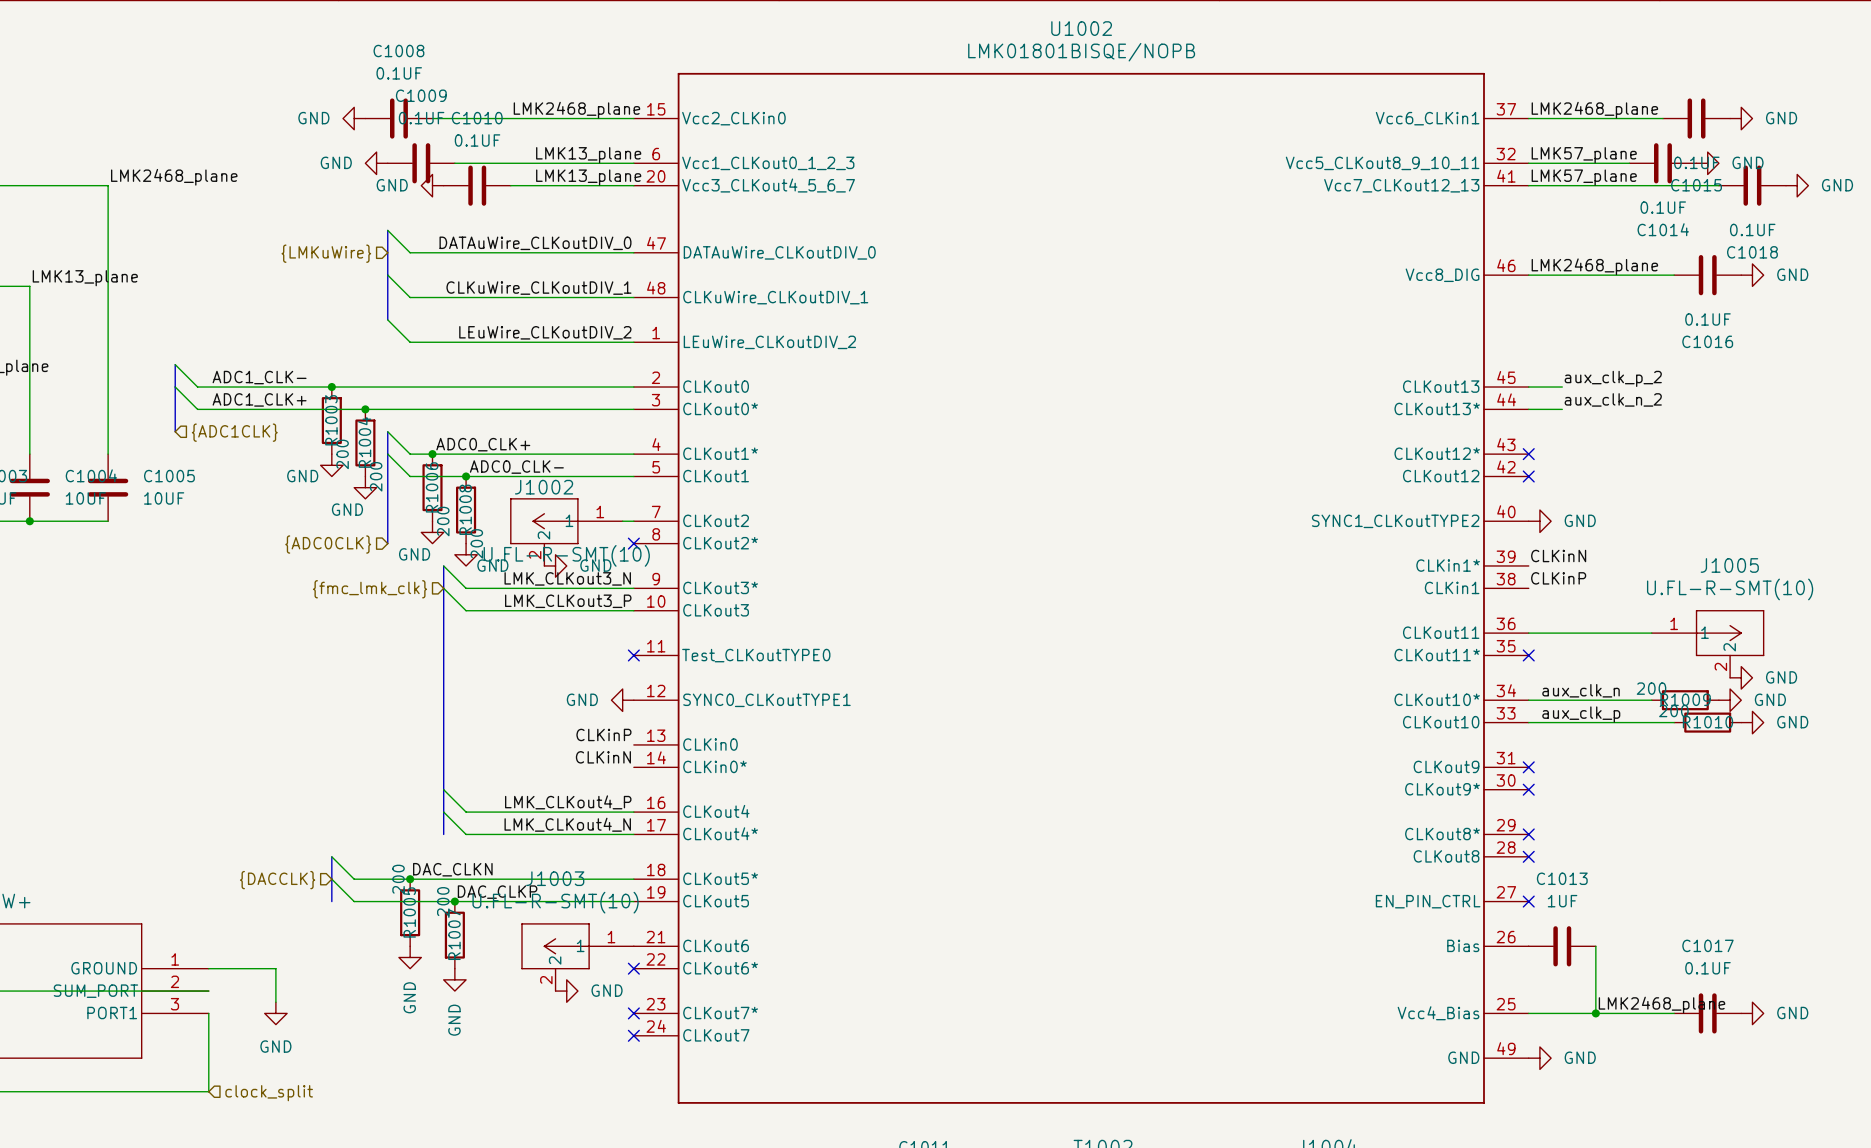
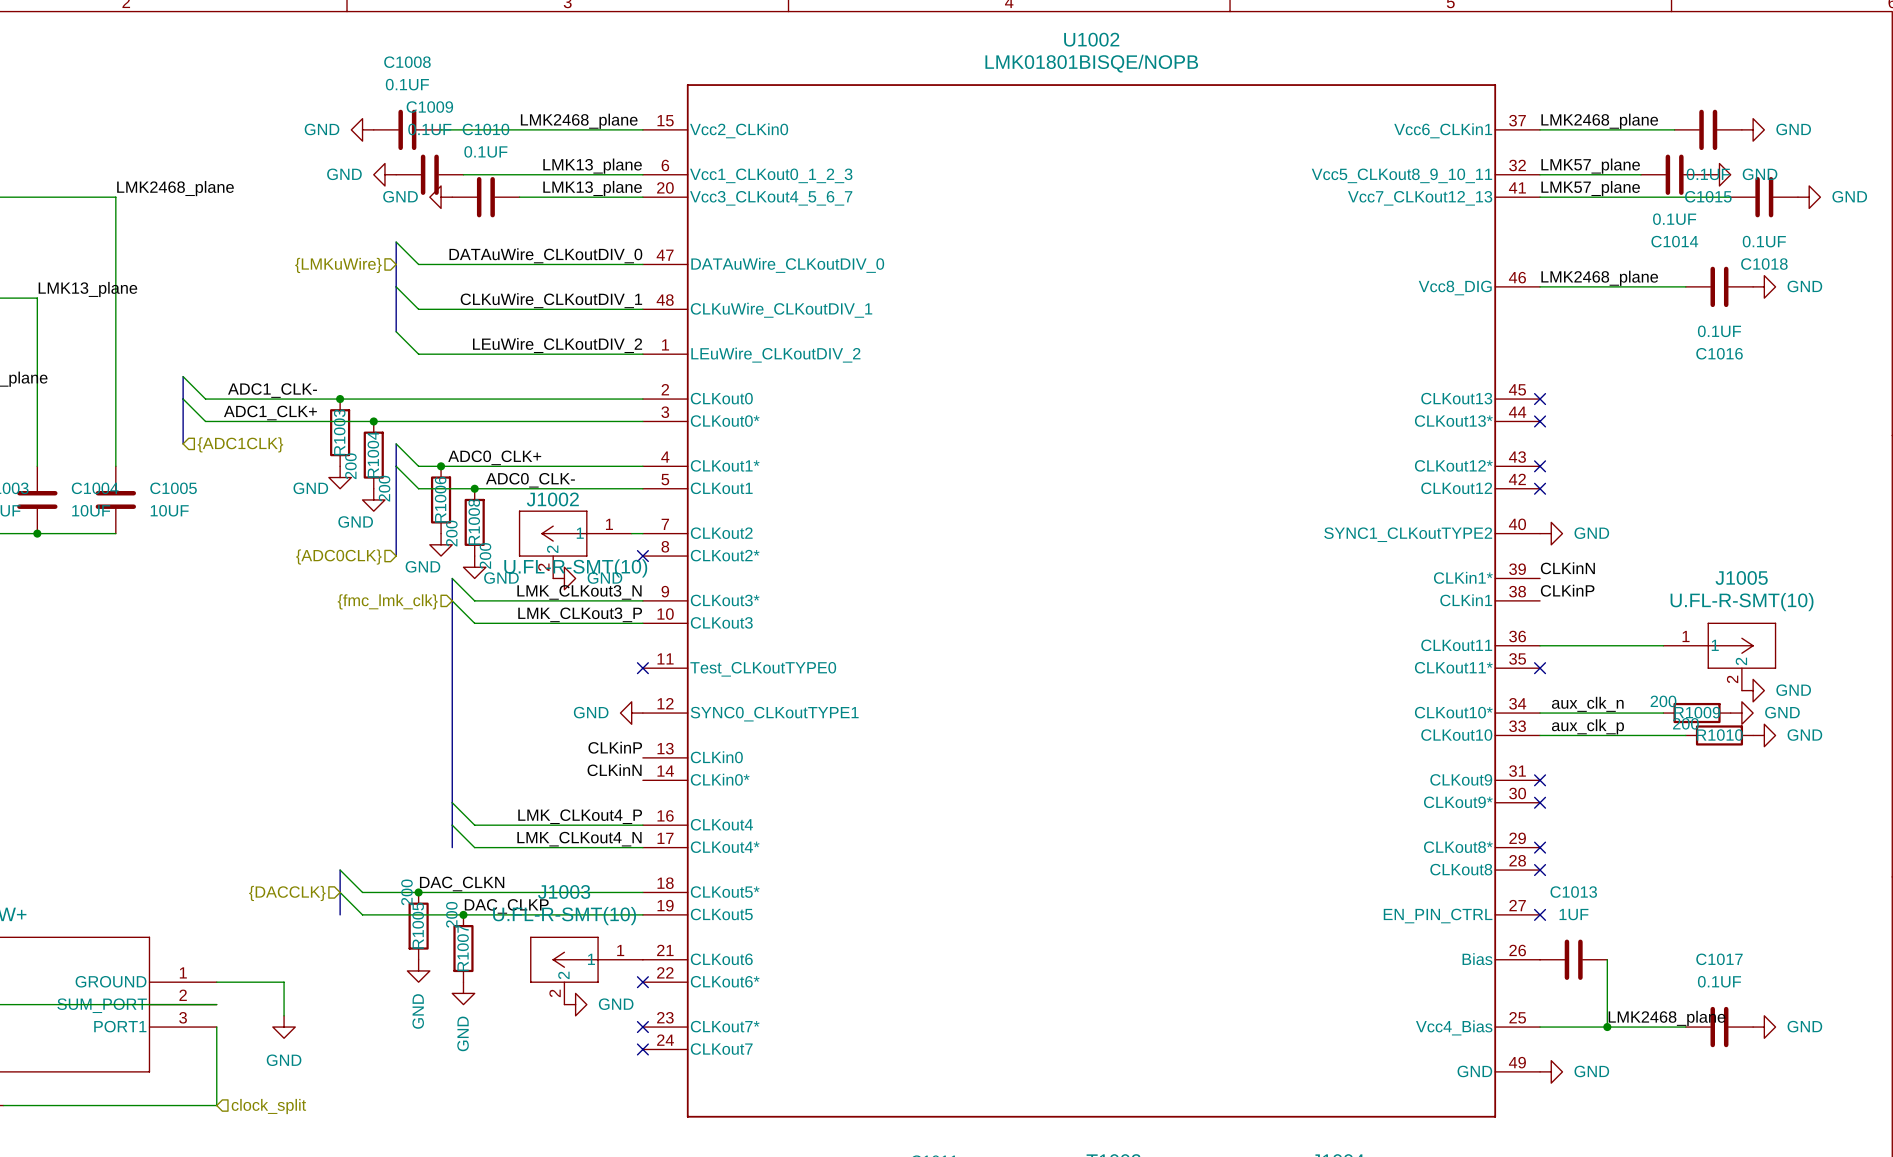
label: aux_clk_p_2 (1613, 378) -> none
wire: (1528, 387) (1562, 387) -> none
no-connect mark: none -> (1540, 399)
label: aux_clk_n_2 (1613, 399) -> none
wire: (1528, 409) (1562, 409) -> none
no-connect mark: none -> (1540, 421)

